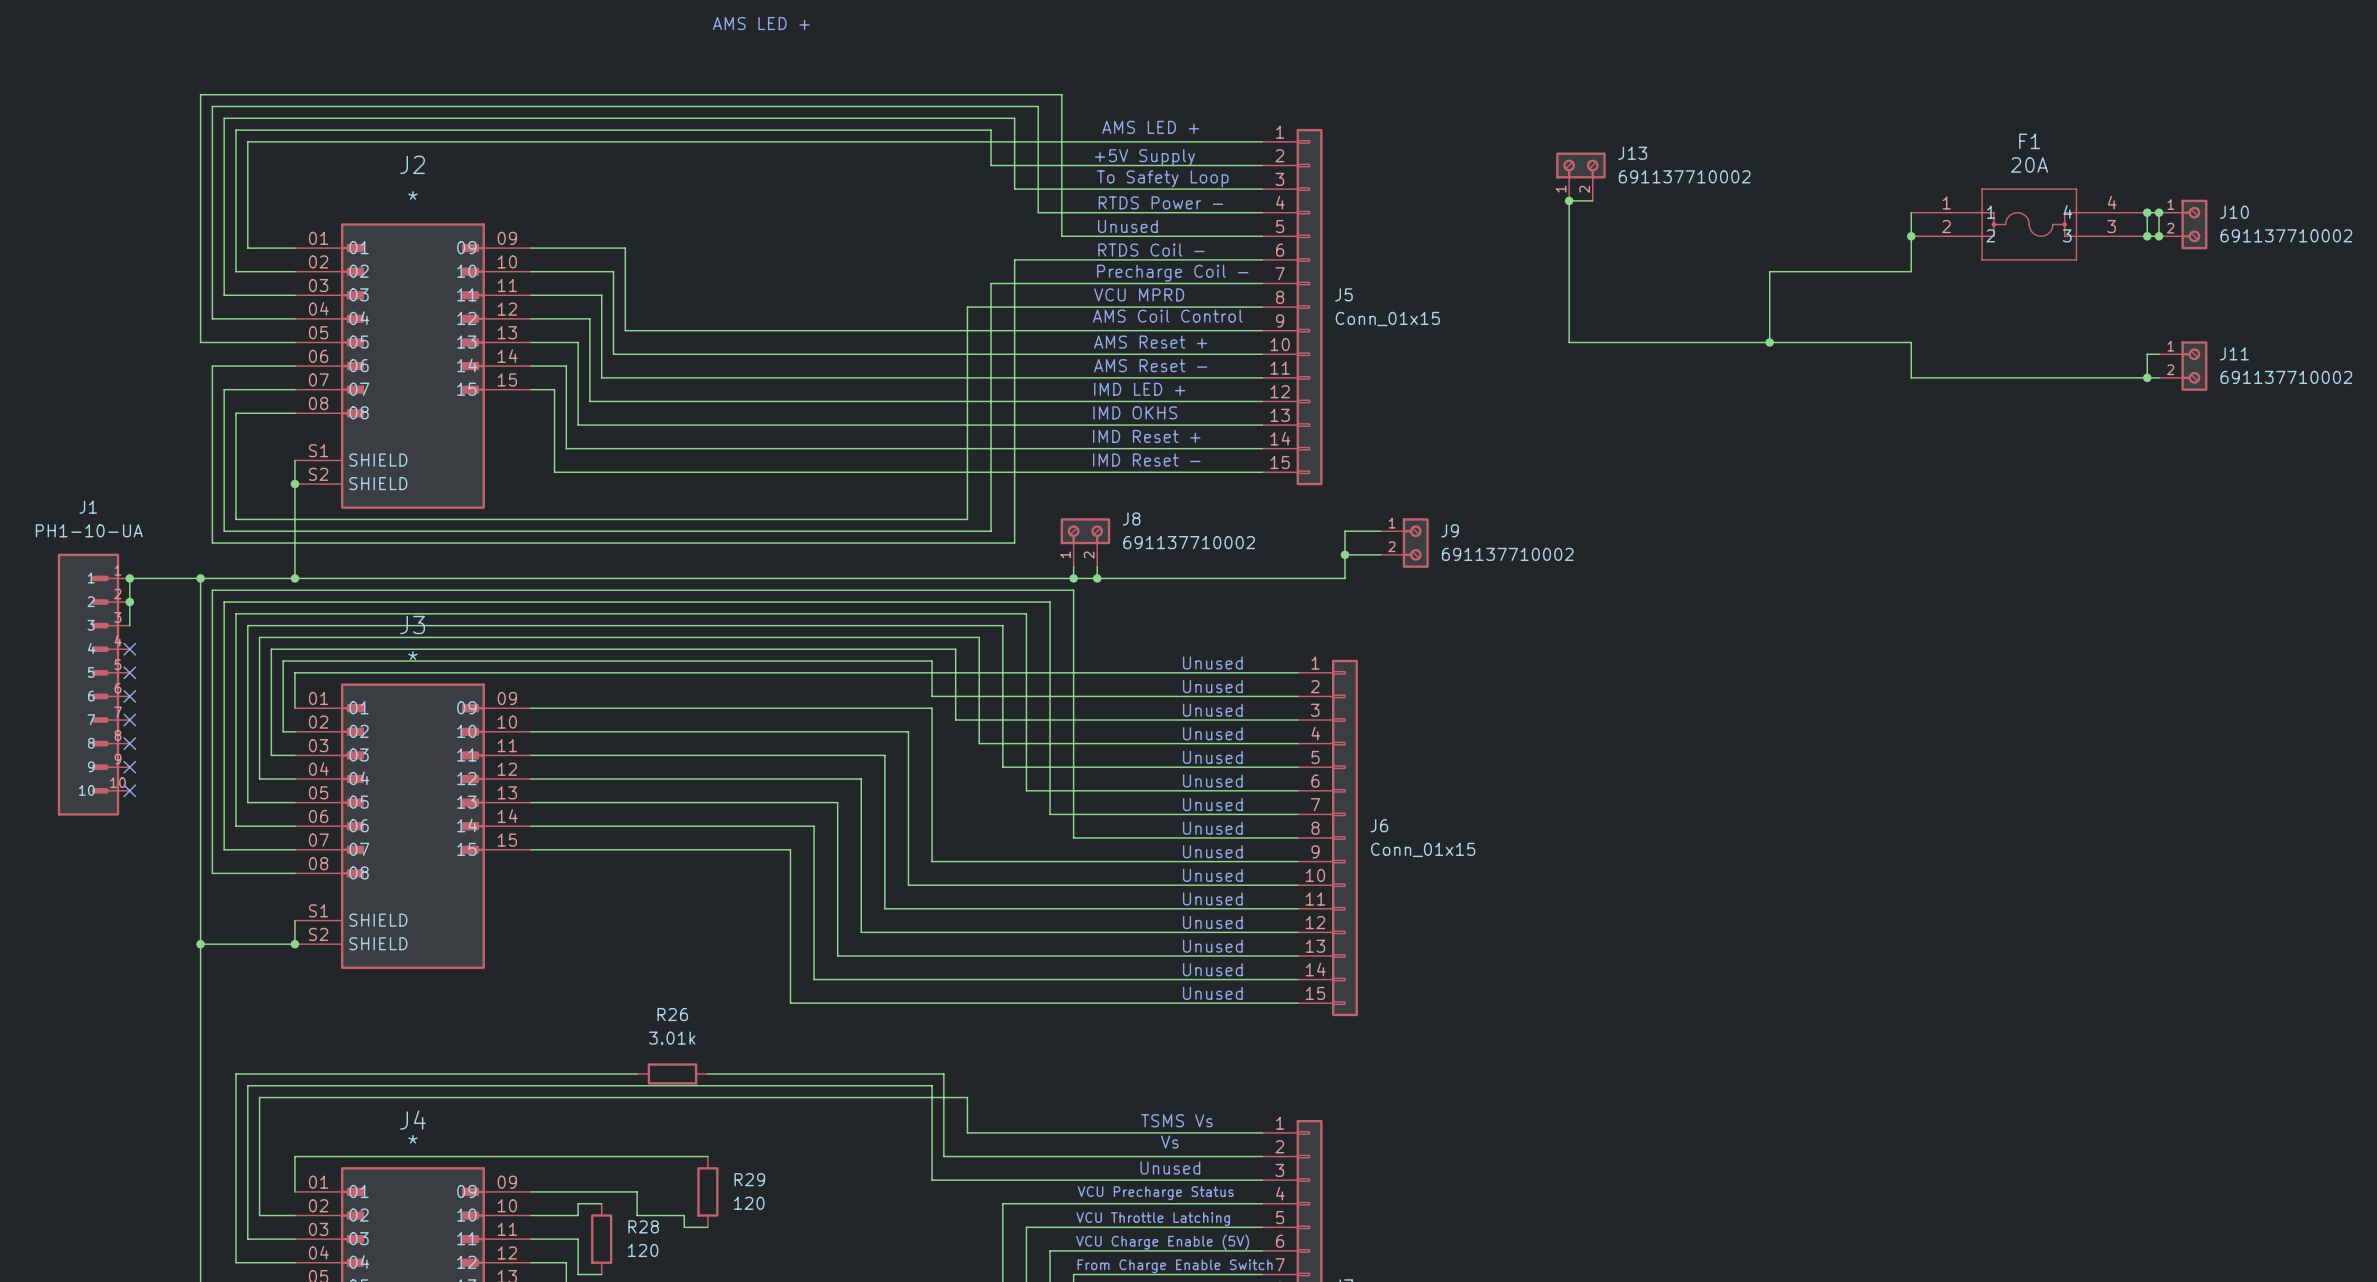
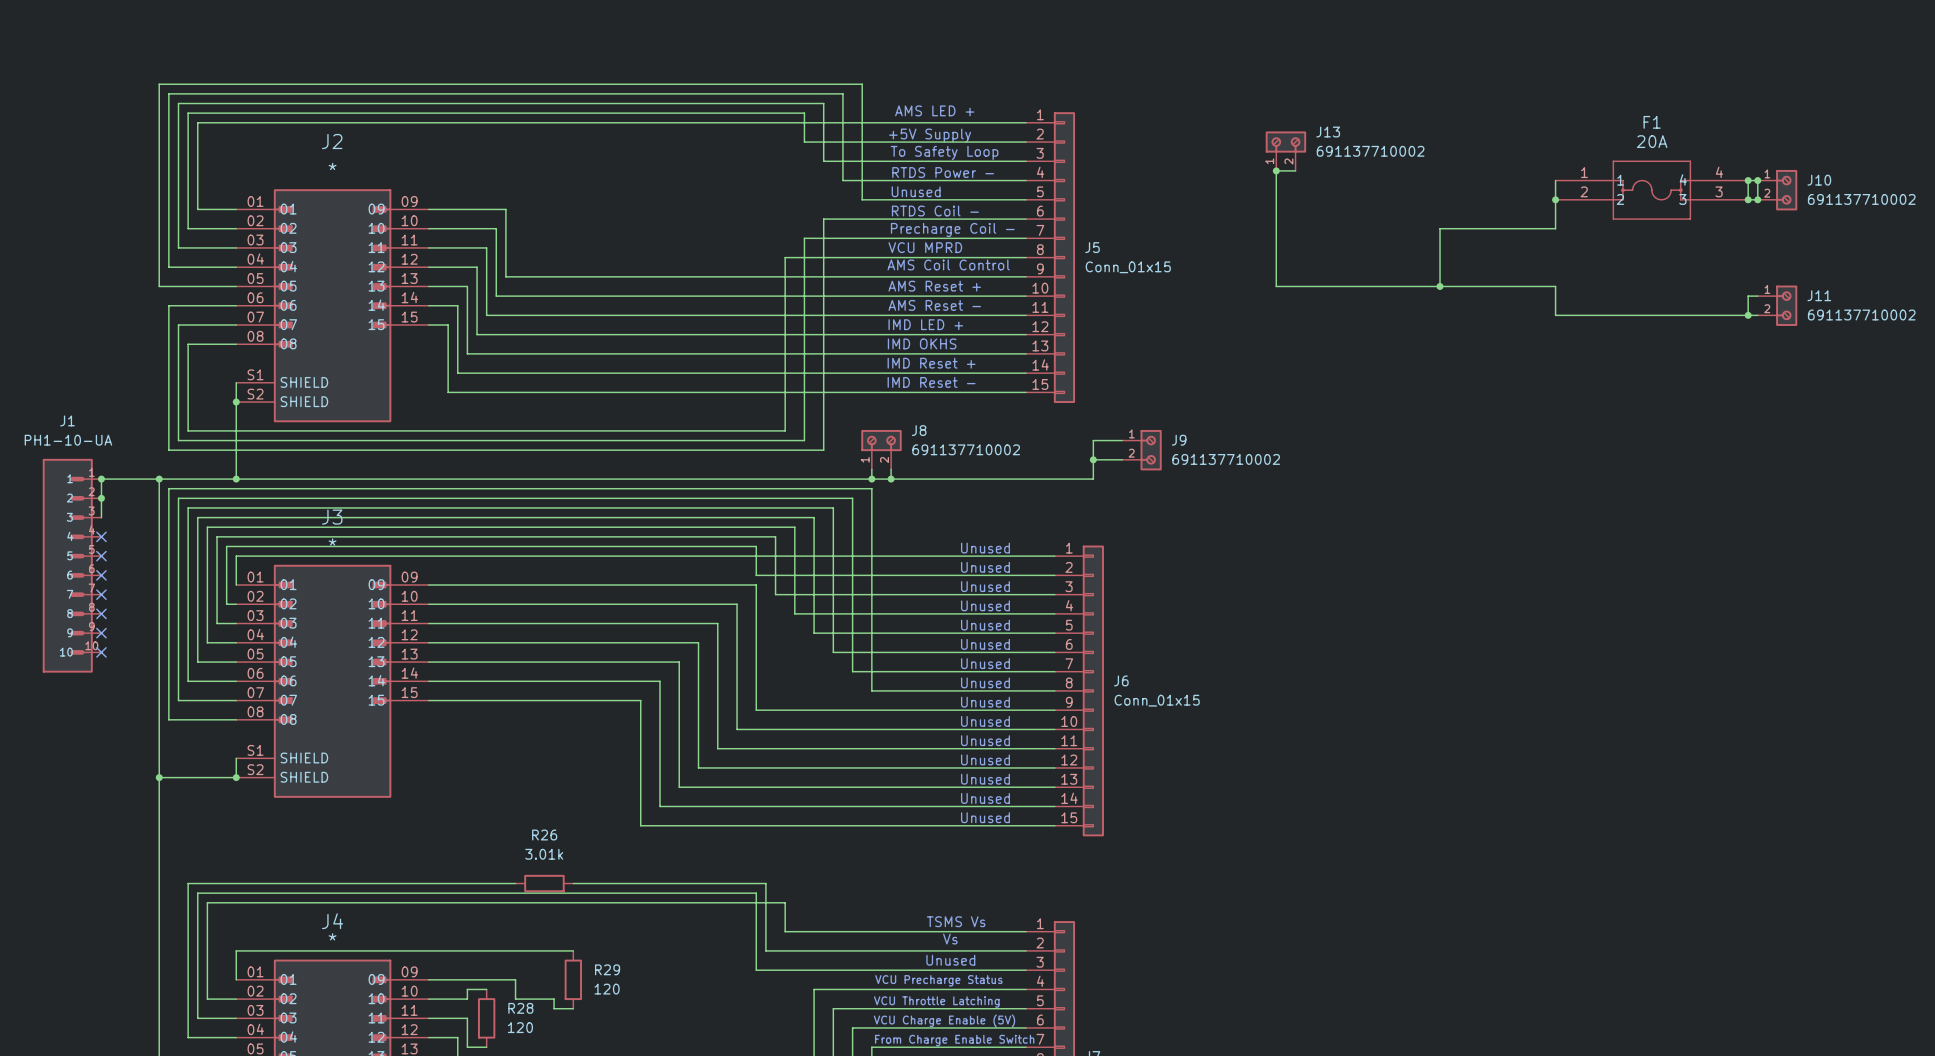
text: AMS LED + (761, 23) -> none

